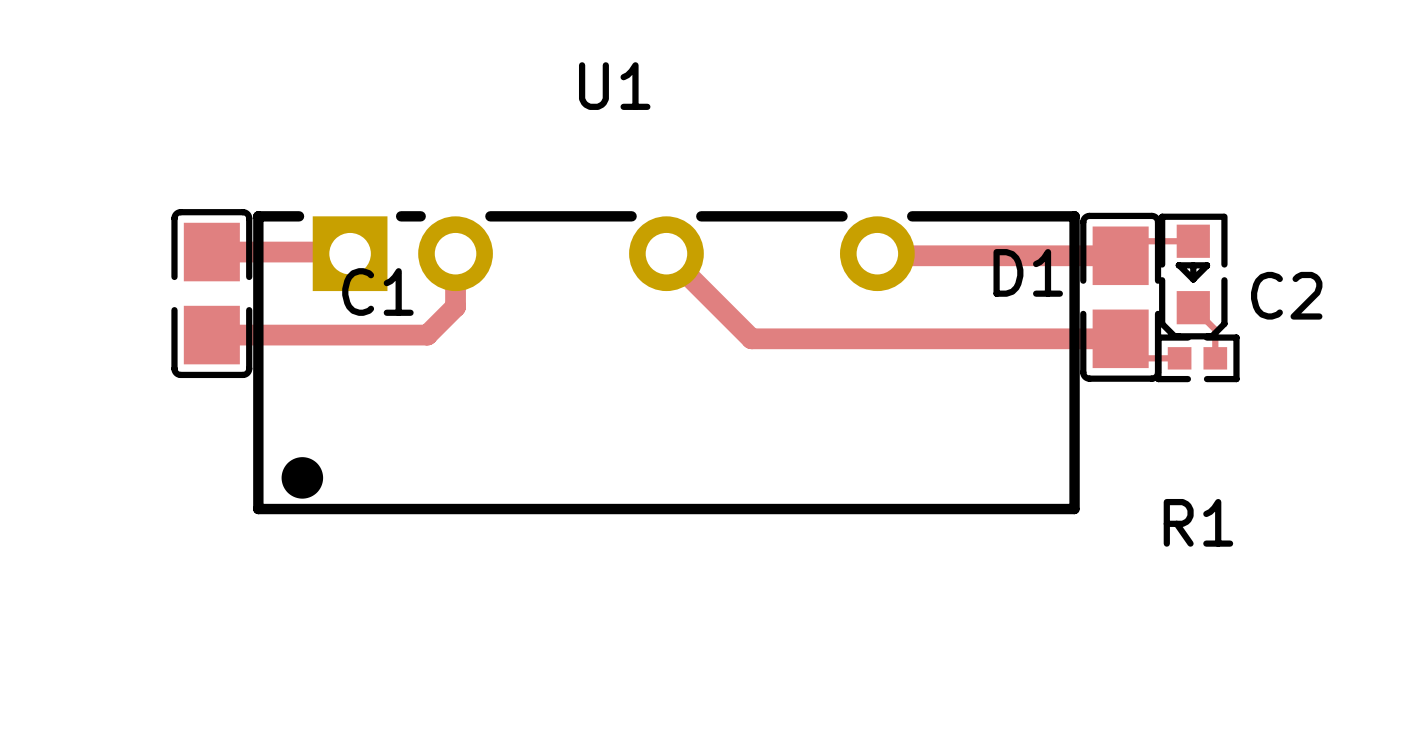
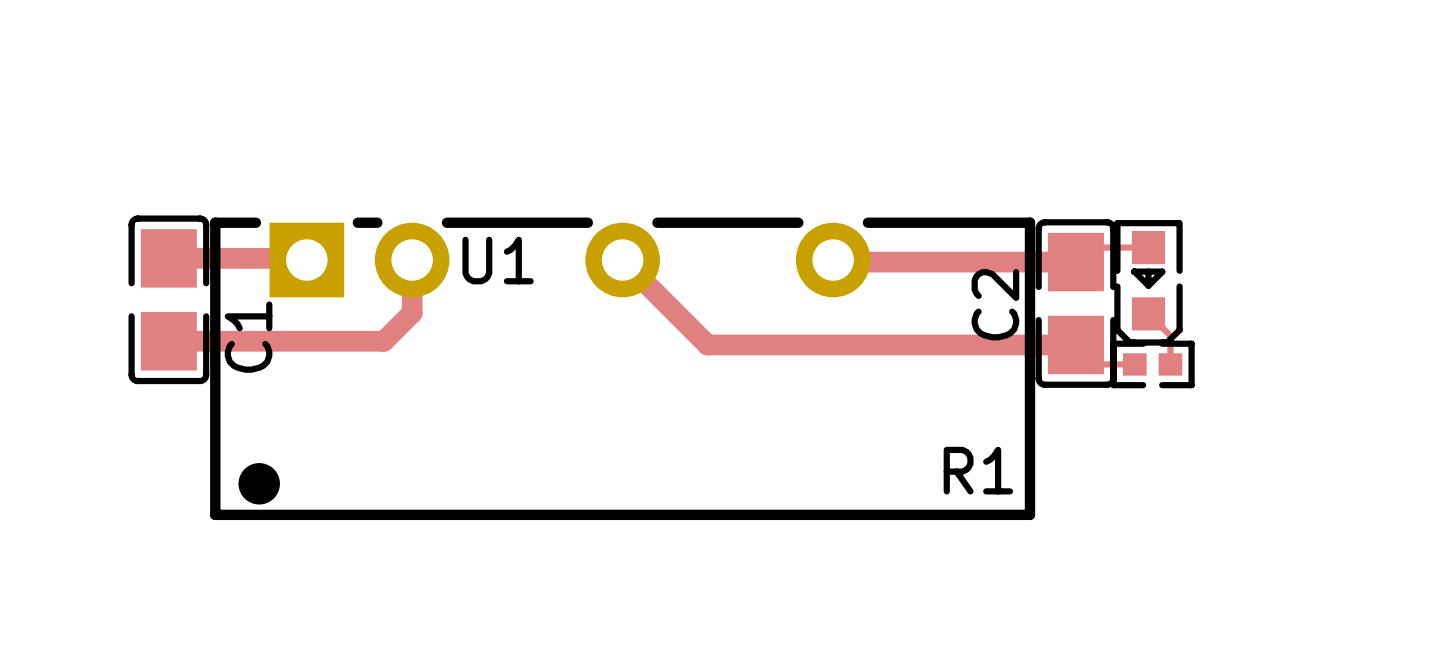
U1 name position: U1 (614, 86) -> U1 (498, 260)
D1 name: D1 (1028, 272) -> none
C1 name rotation: 0° (377, 292) -> 90° counterclockwise (248, 337)
C2 name rotation: 0° (1286, 295) -> 90° counterclockwise (995, 304)
C2 name position: C2 (1286, 295) -> C2 (995, 304)
R1 name position: R1 (1198, 522) -> R1 (978, 470)

